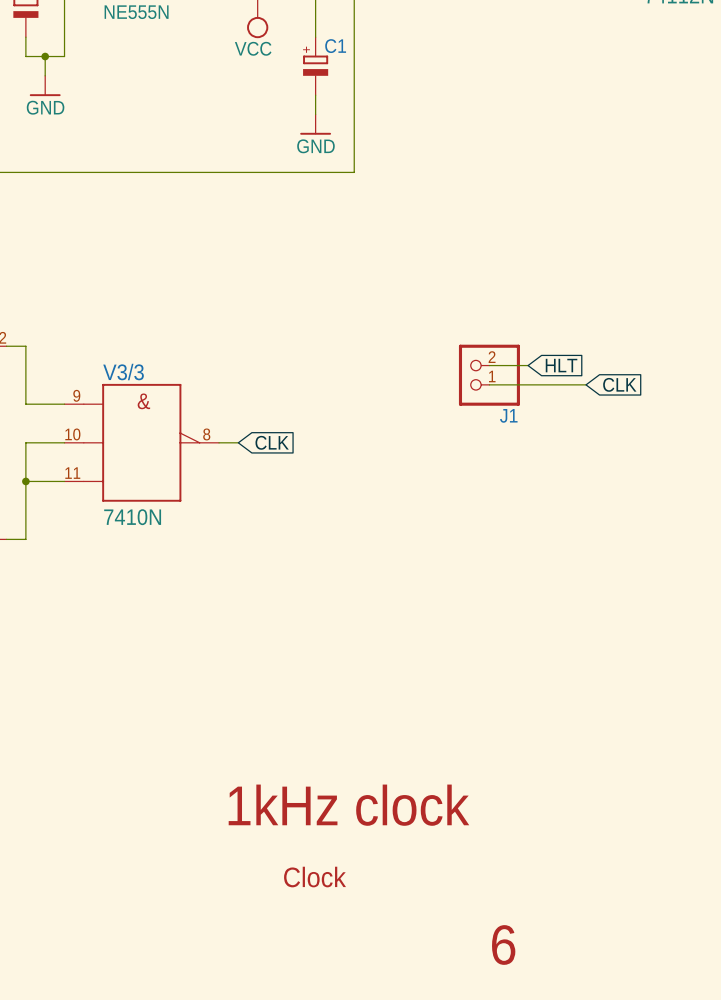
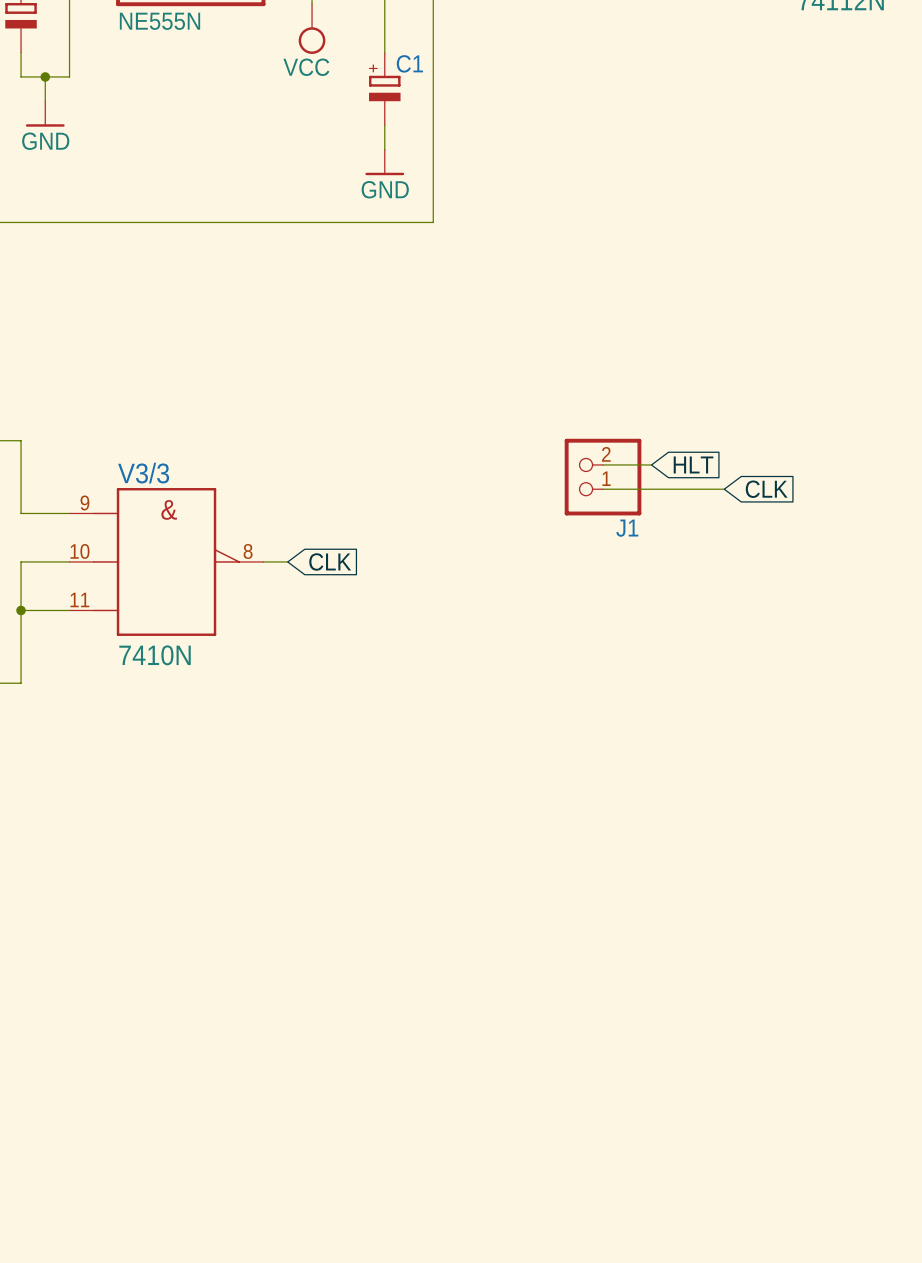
text: 1kHz clock (348, 805) -> none
text: Clock (315, 877) -> none
text: 6 (503, 945) -> none

